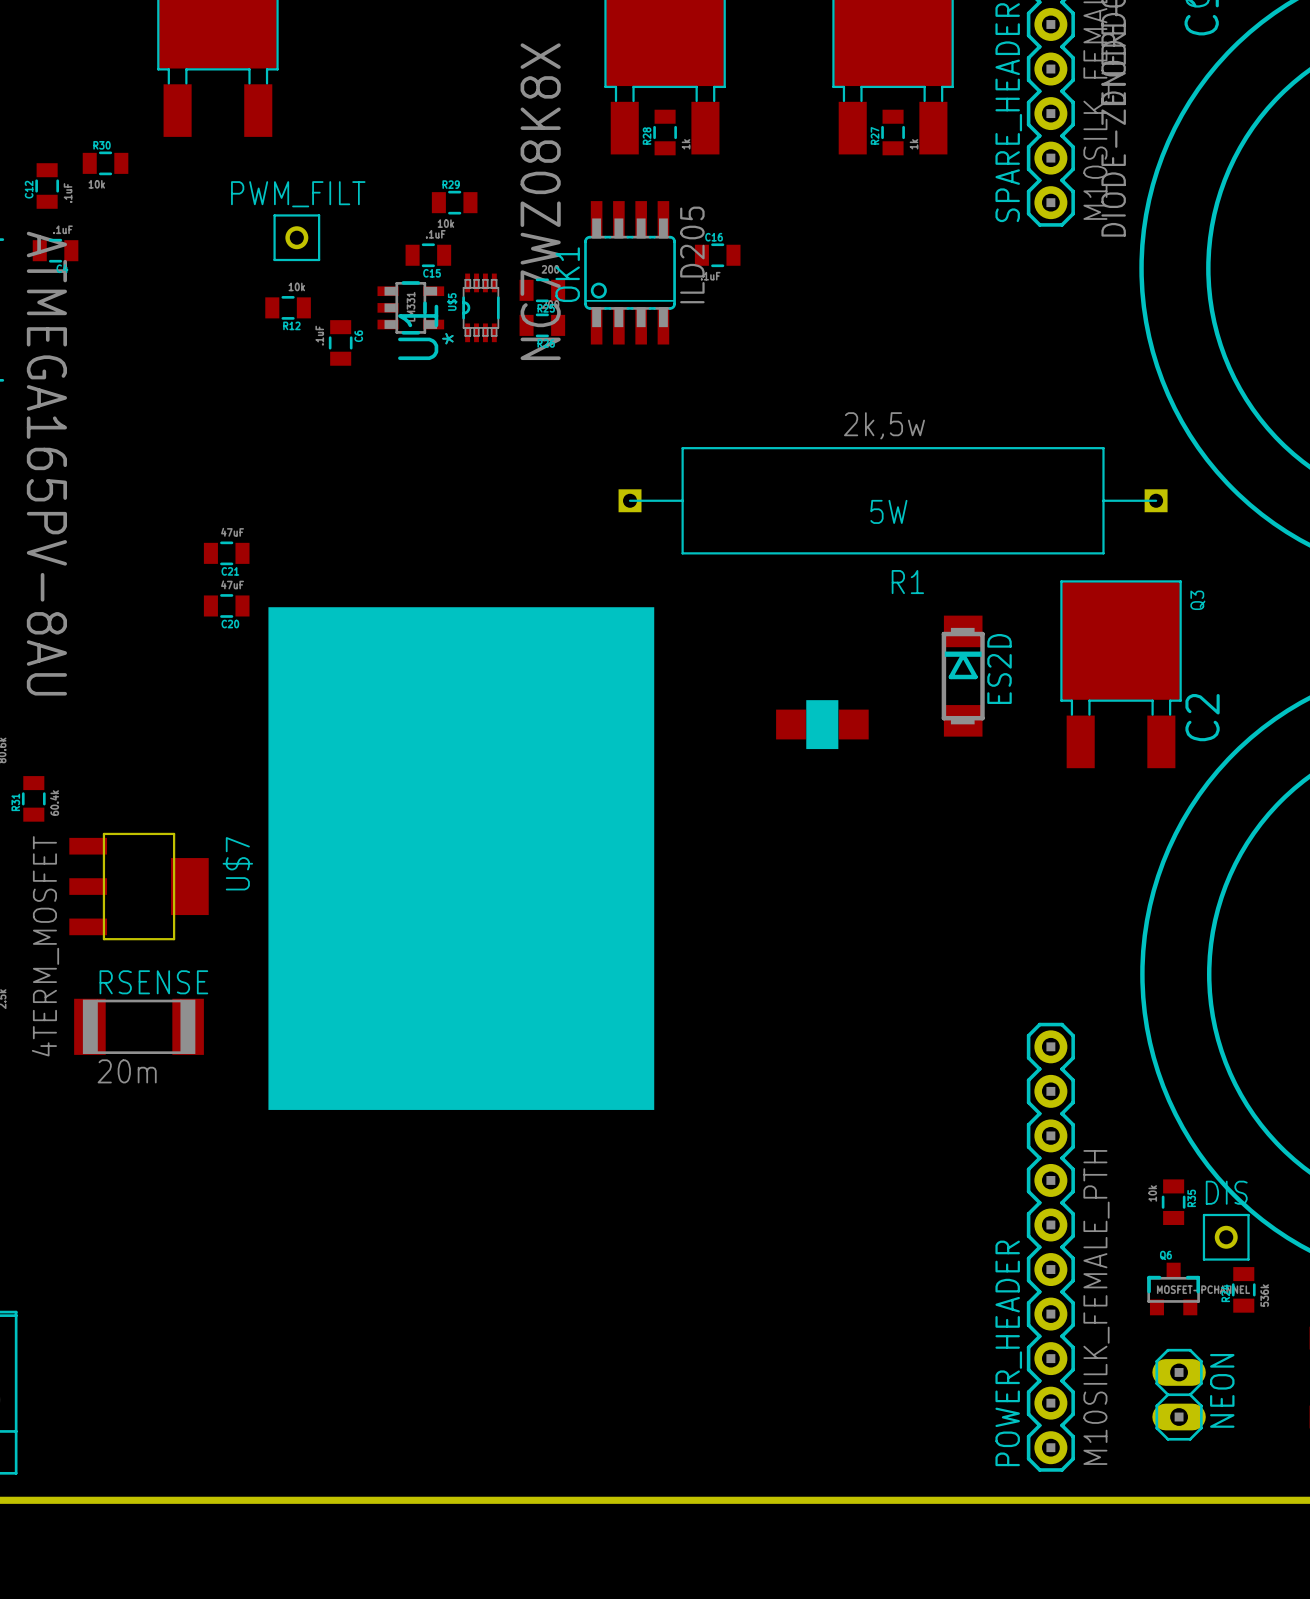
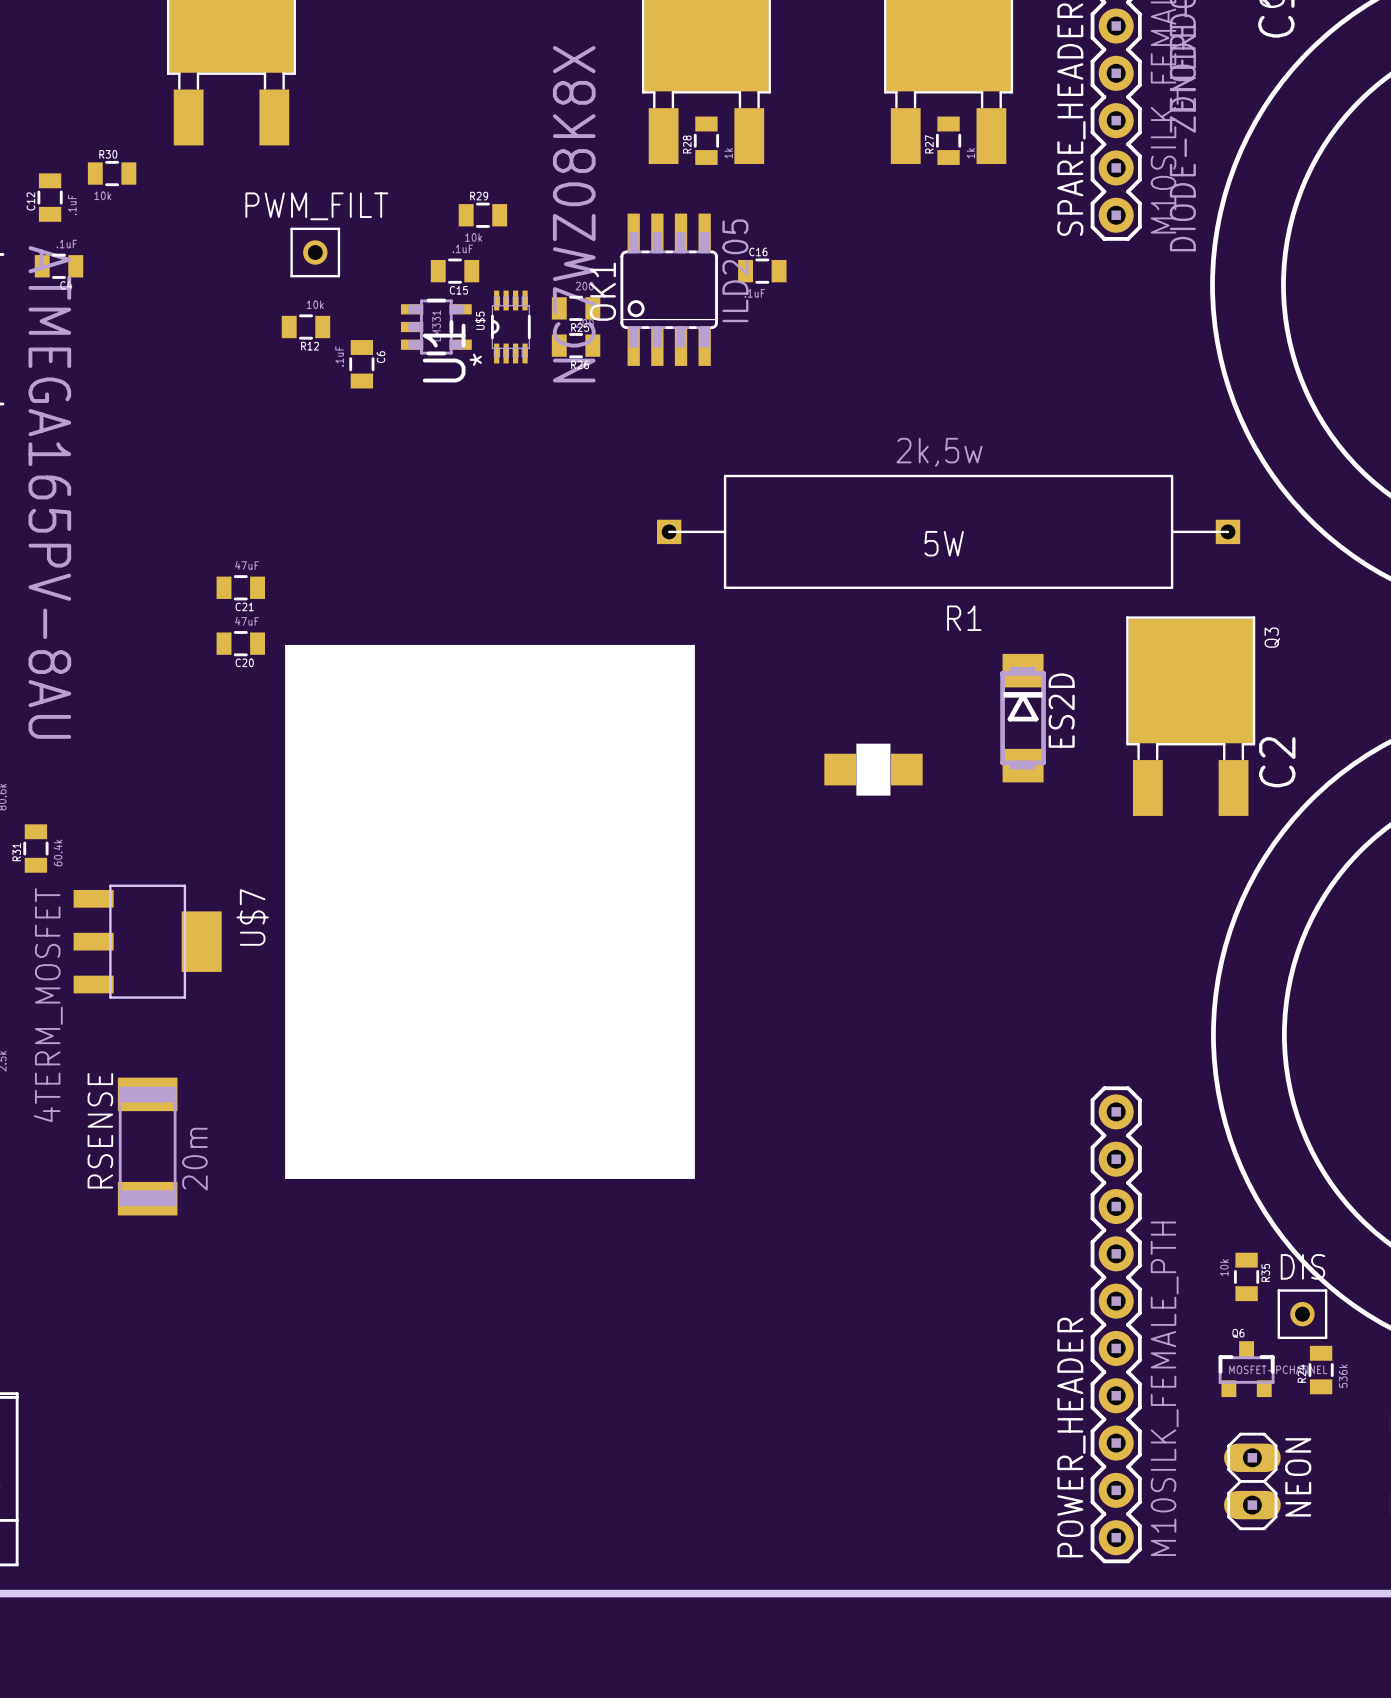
RSENSE name position: RSENSE (153, 982) -> RSENSE (100, 1130)
RSENSE rotation: 0° (139, 1026) -> 90° clockwise (147, 1146)
RSENSE value position: 20m (127, 1071) -> 20m (194, 1159)

